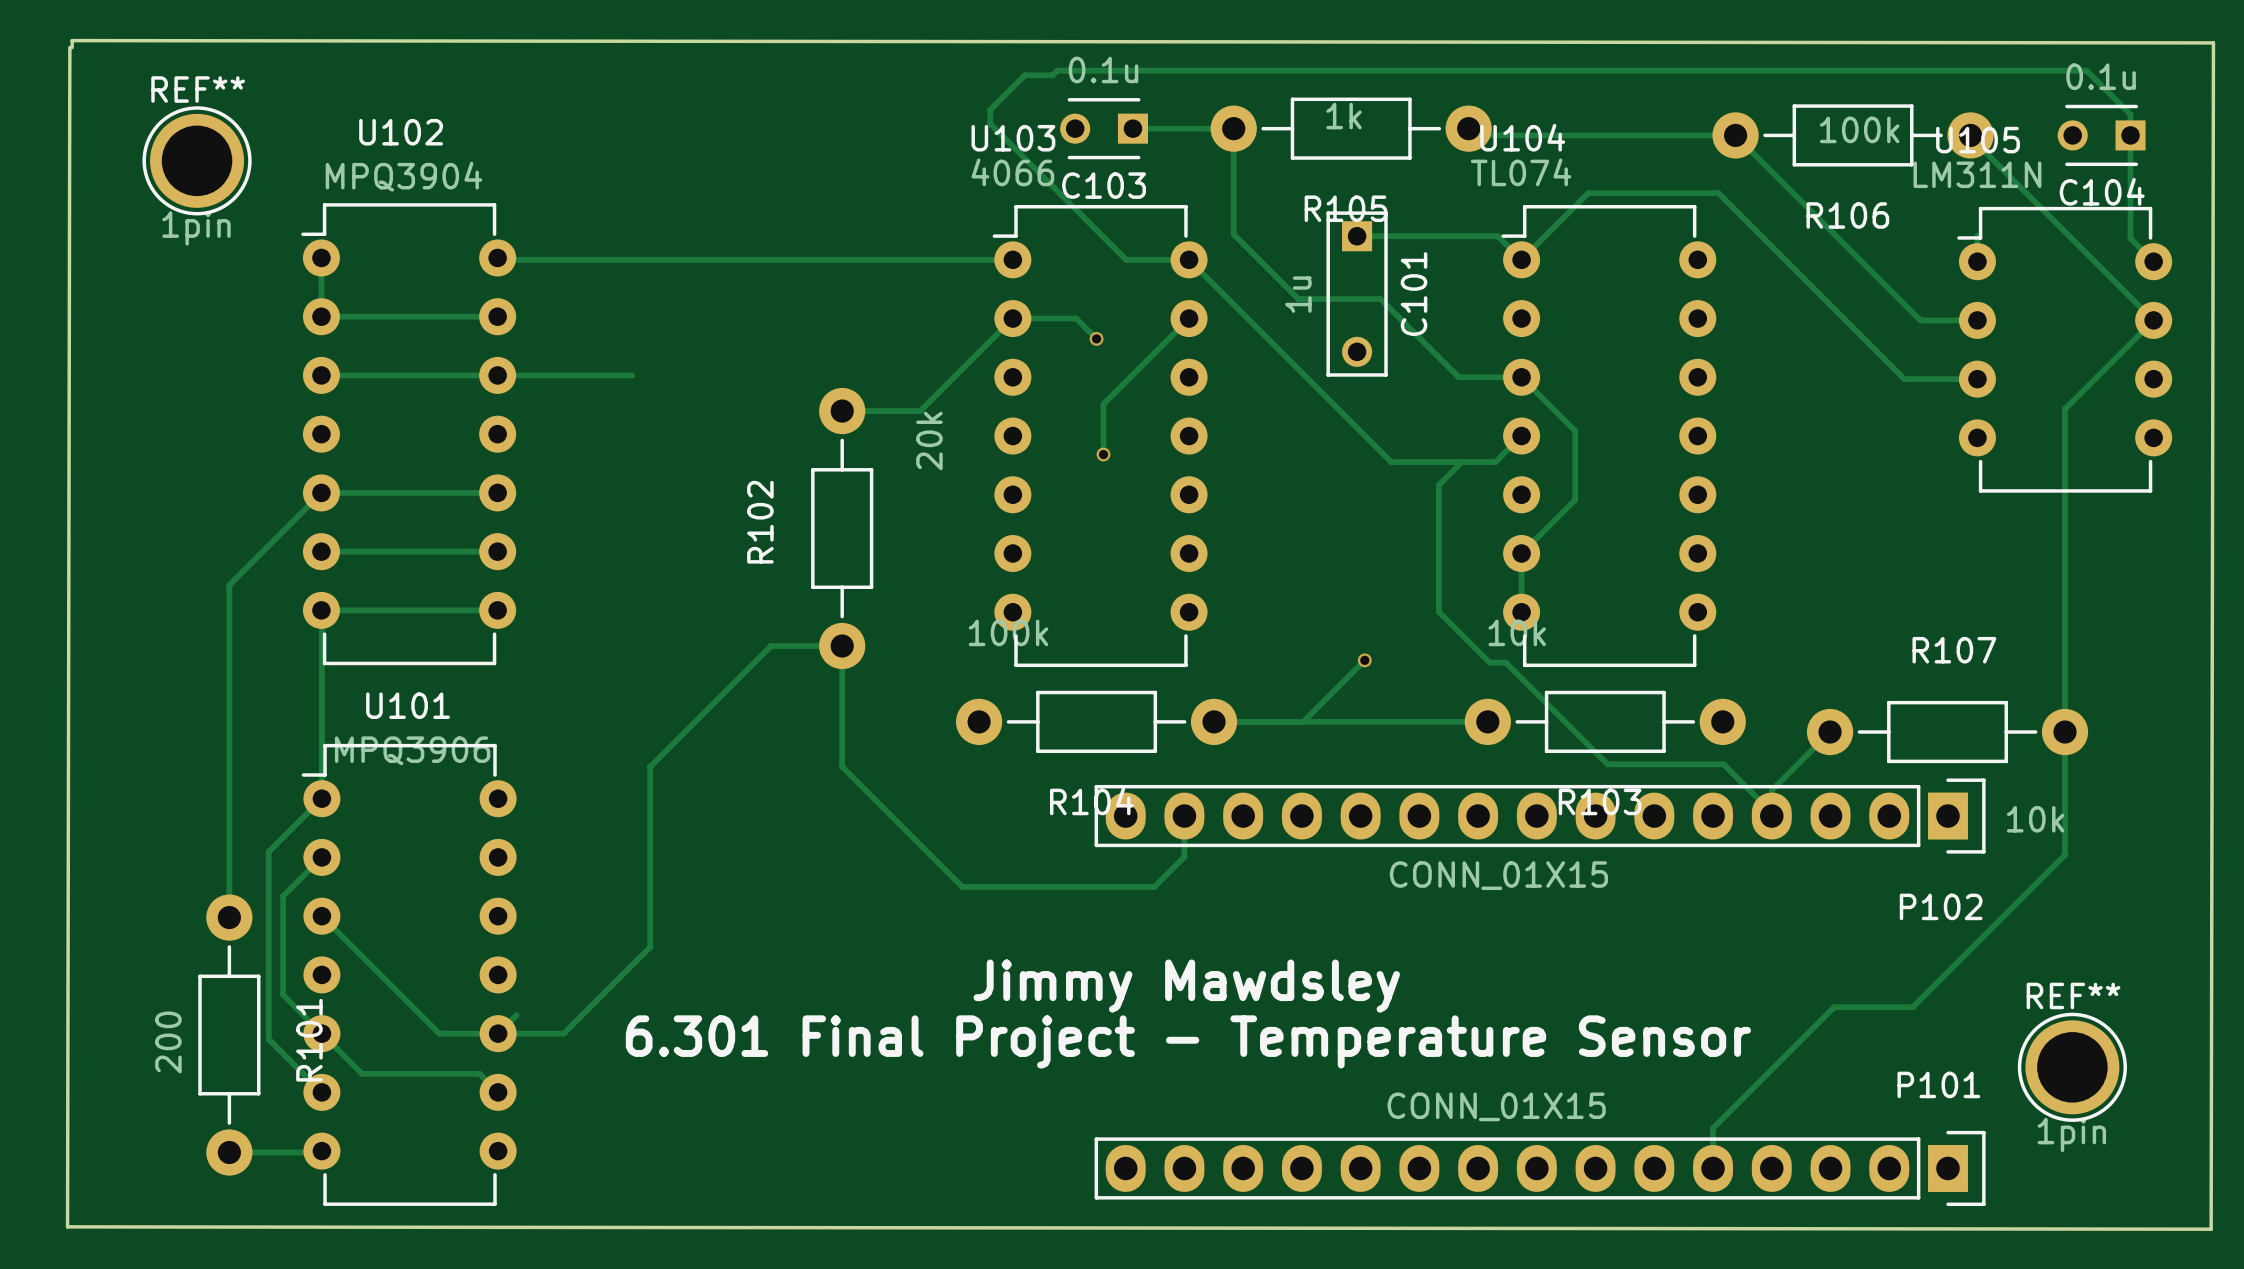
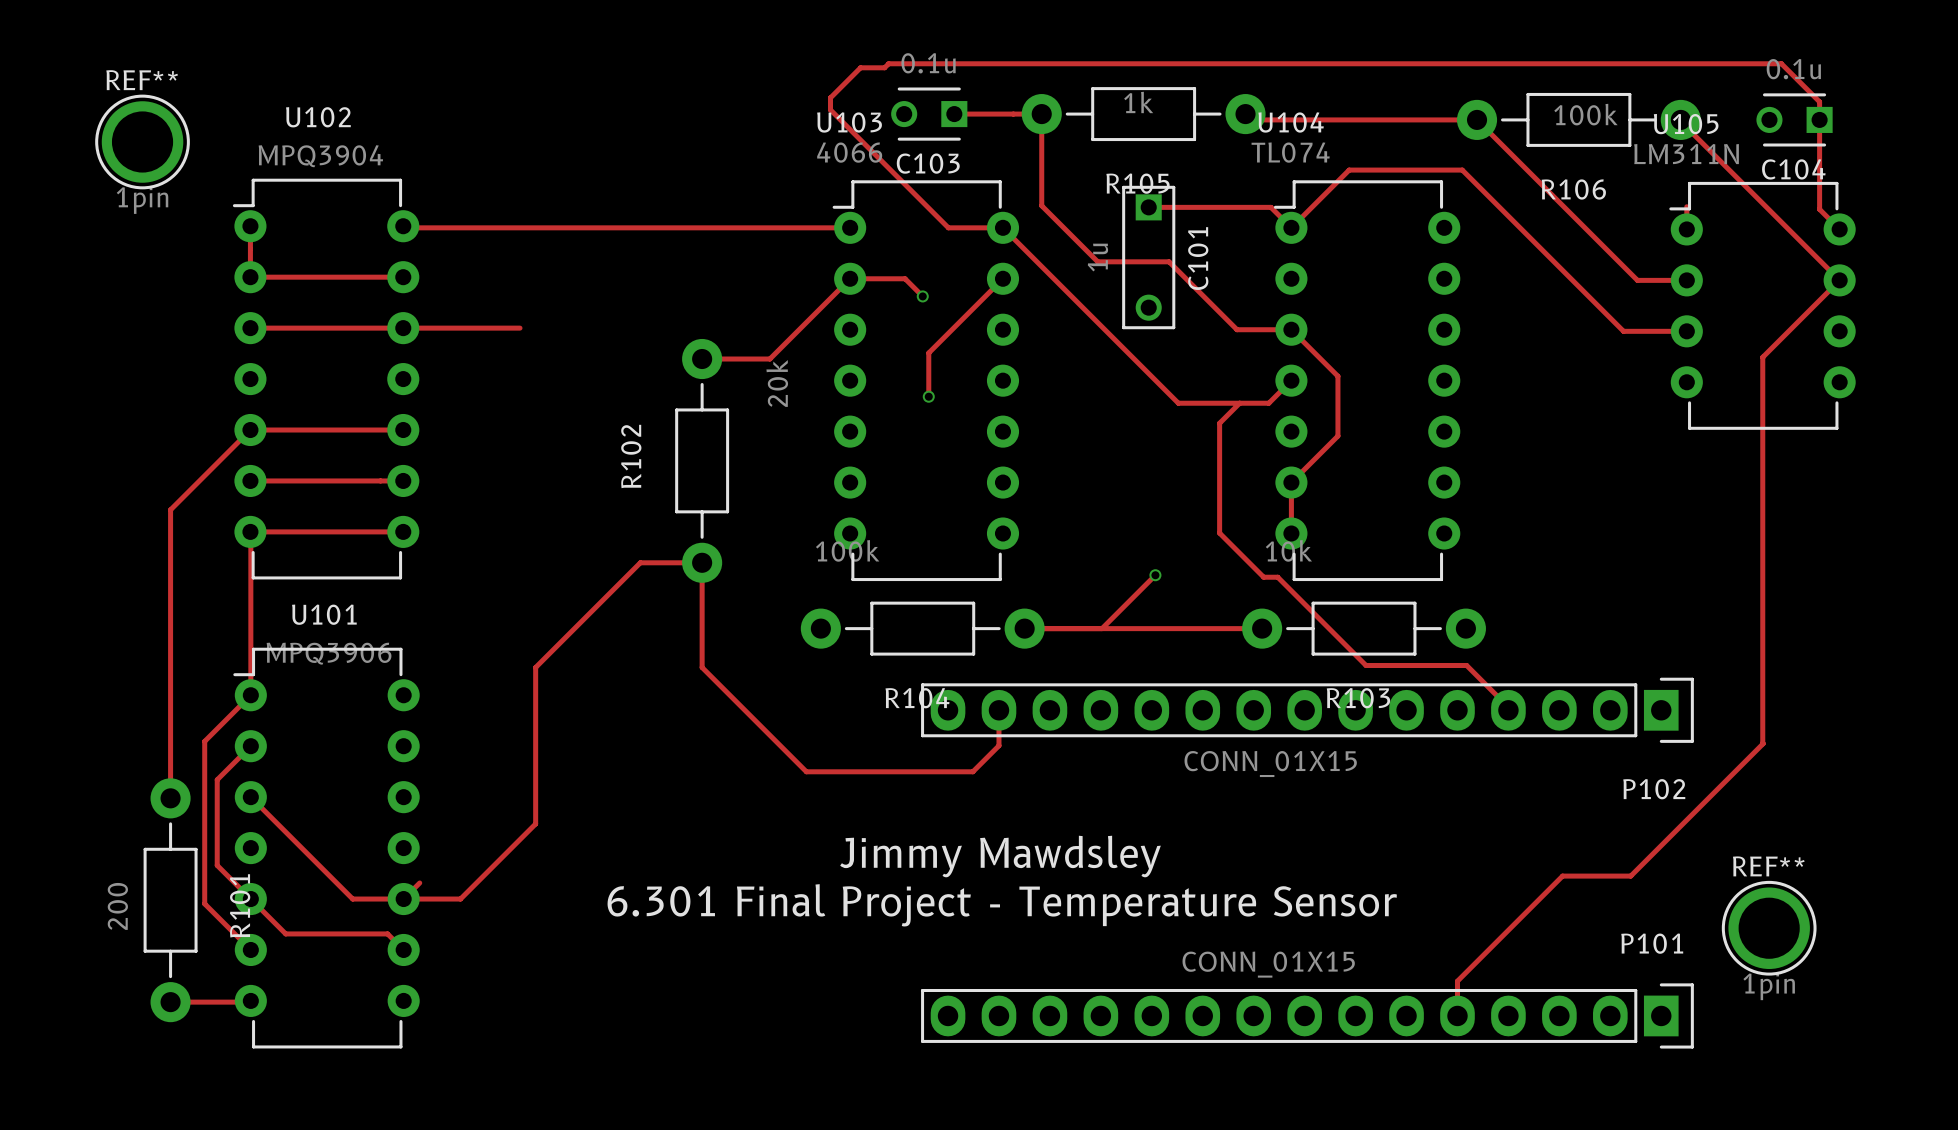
board edge: (69, 47) (67, 1226) (2211, 1229) (2213, 42) (72, 40) (72, 47) -> none
track: (1830, 732) (1771, 790) (1771, 812) -> none
R107: 10k (1947, 732) -> none

